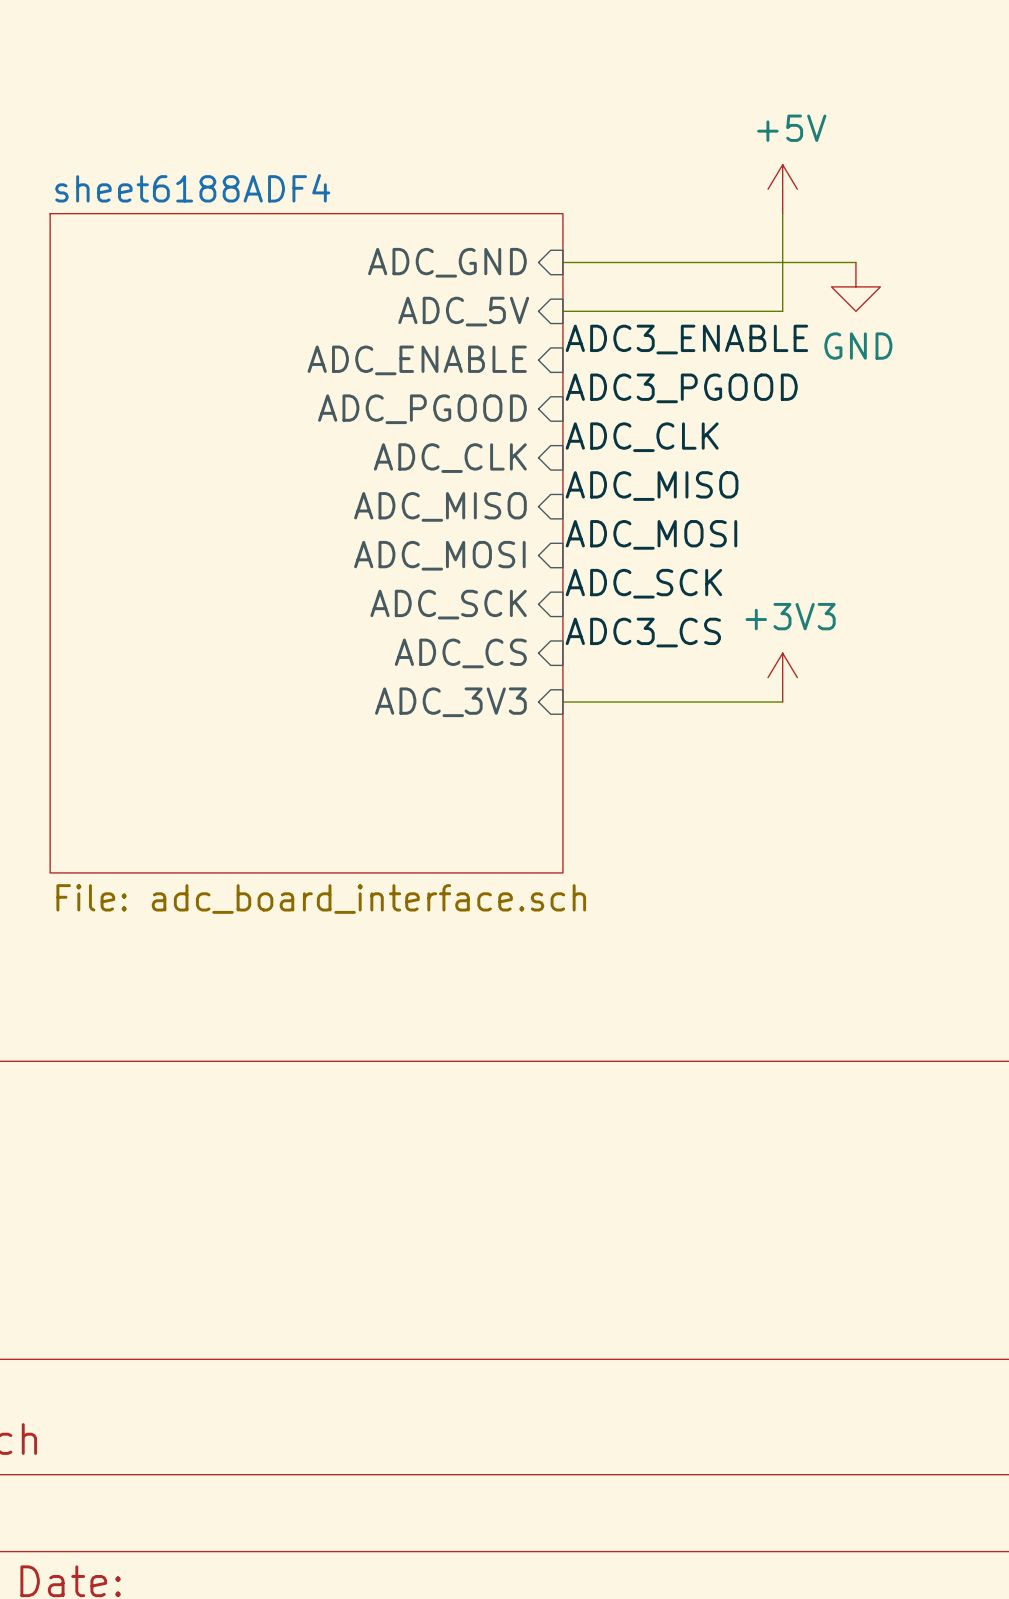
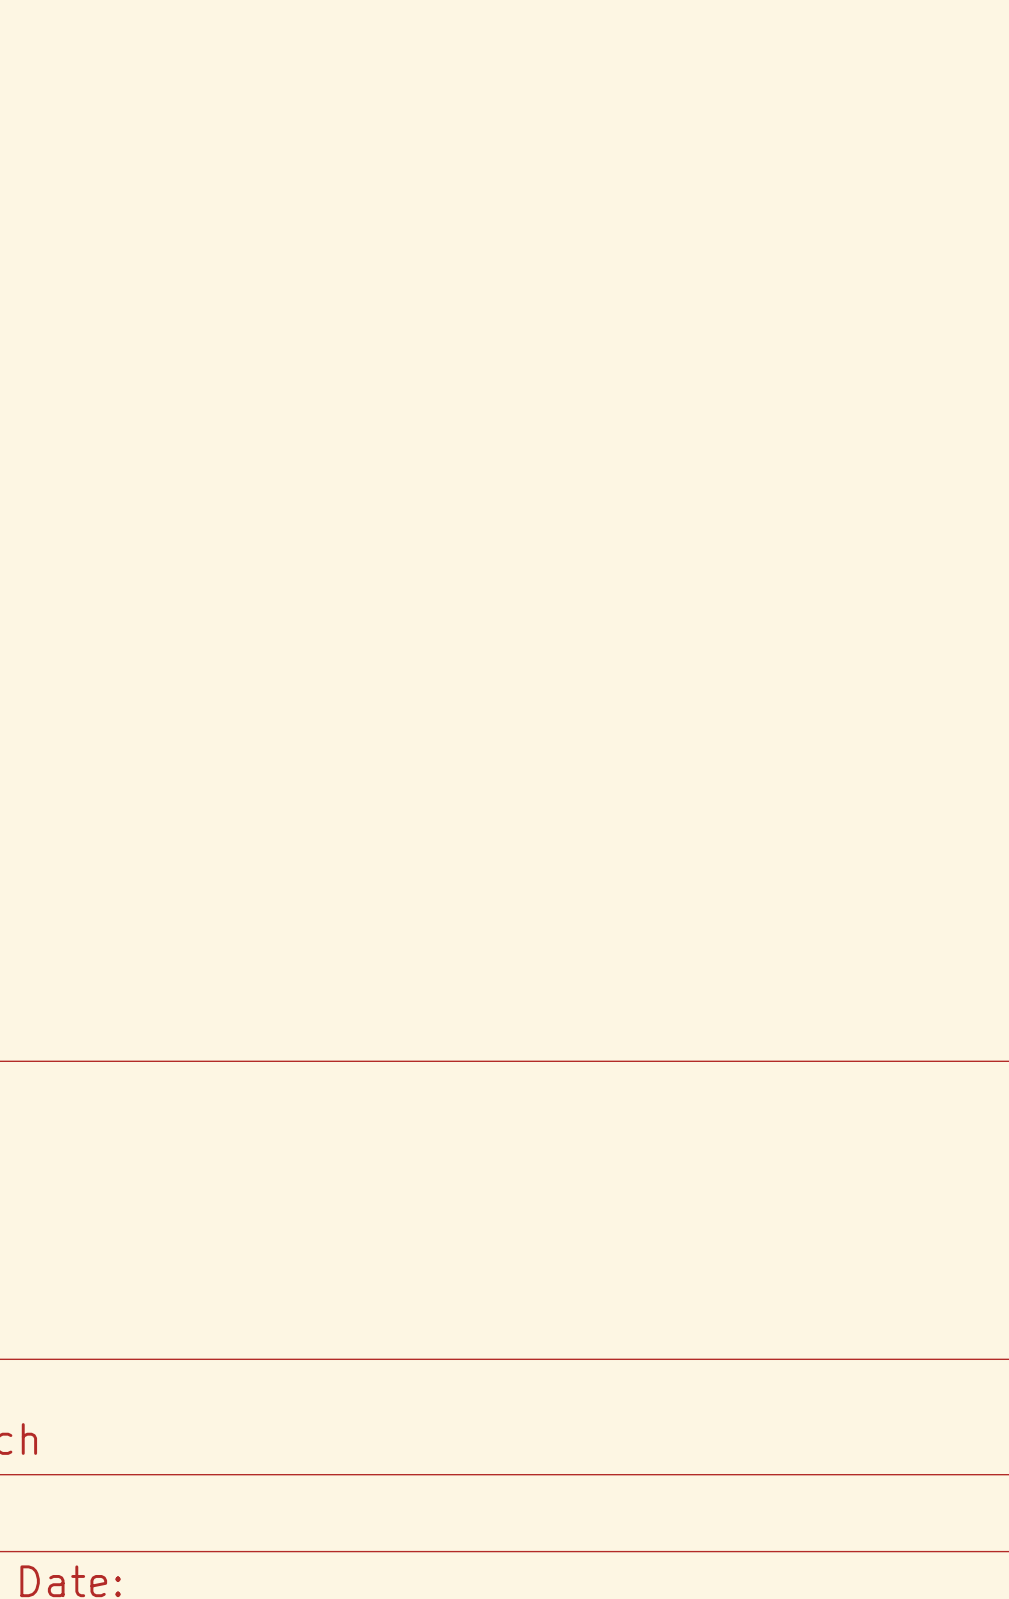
power symbol: +5V (782, 189) -> none
wire: (782, 213) (782, 311) (562, 311) -> none
sheet pin: ADC_GND (447, 262) -> none
wire: (562, 262) (855, 262) -> none
power symbol: GND (855, 286) -> none
sheet pin: ADC_5V (463, 311) -> none
label: ADC3_ENABLE (686, 339) -> none
sheet pin: ADC_ENABLE (417, 360) -> none
label: ADC3_PGOOD (681, 388) -> none
sheet pin: ADC_PGOOD (422, 409) -> none
label: ADC_CLK (642, 437) -> none
sheet pin: ADC_CLK (450, 458) -> none
label: ADC_MISO (652, 486) -> none
sheet pin: ADC_MISO (440, 506) -> none
label: ADC_MOSI (651, 534) -> none
sheet sheet6188ADF4: File: adc_board_interface.sch (306, 543) -> none
sheet pin: ADC_MOSI (439, 555) -> none
label: ADC_SCK (643, 583) -> none
sheet pin: ADC_SCK (448, 604) -> none
label: ADC3_CS (643, 632) -> none
sheet pin: ADC_CS (460, 653) -> none
power symbol: +3V3 (782, 677) -> none
sheet pin: ADC_3V3 (450, 702) -> none
wire: (562, 702) (782, 702) -> none

